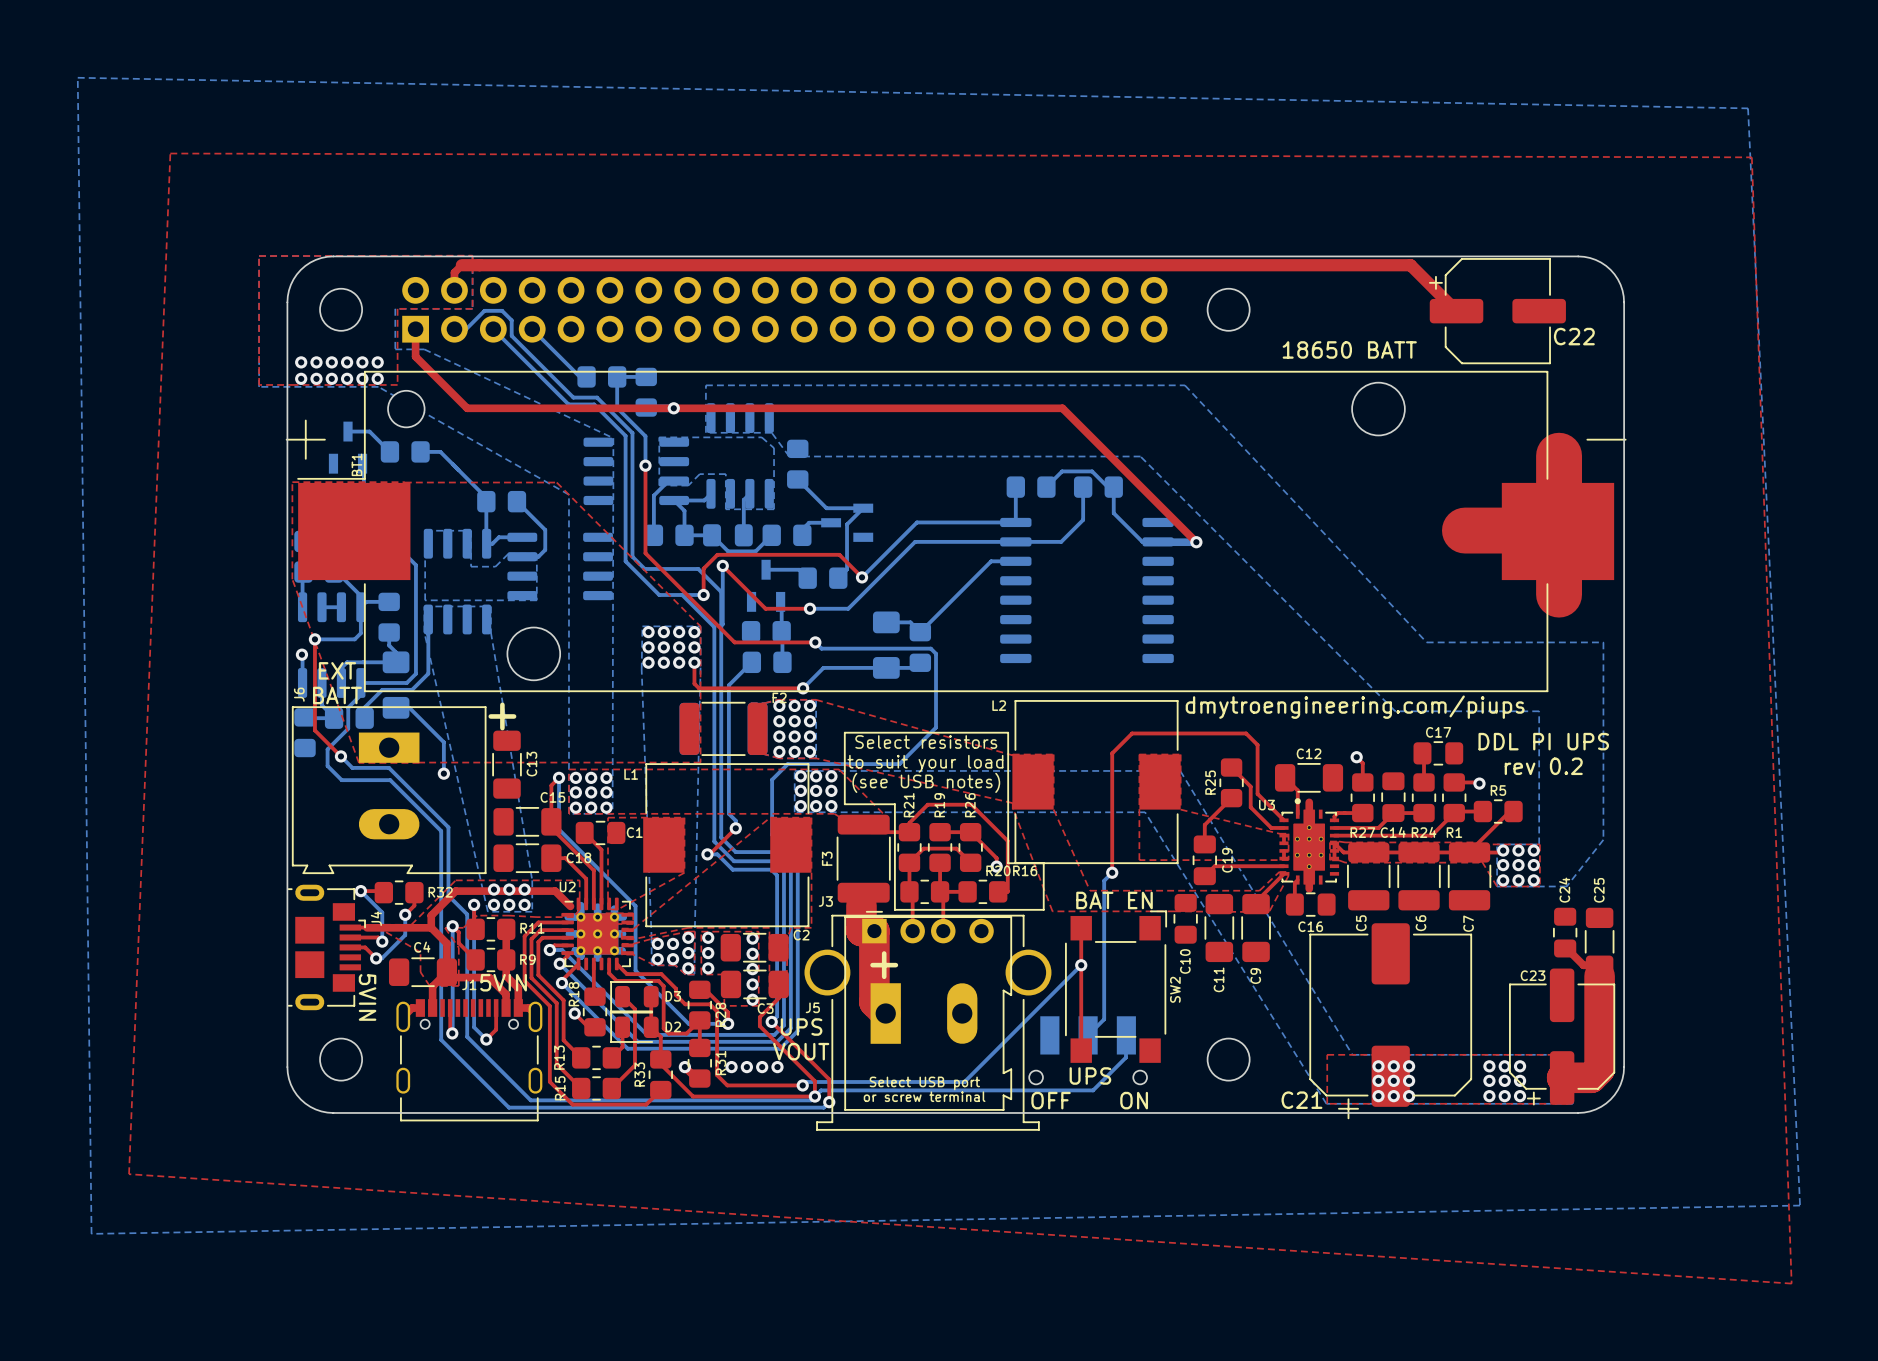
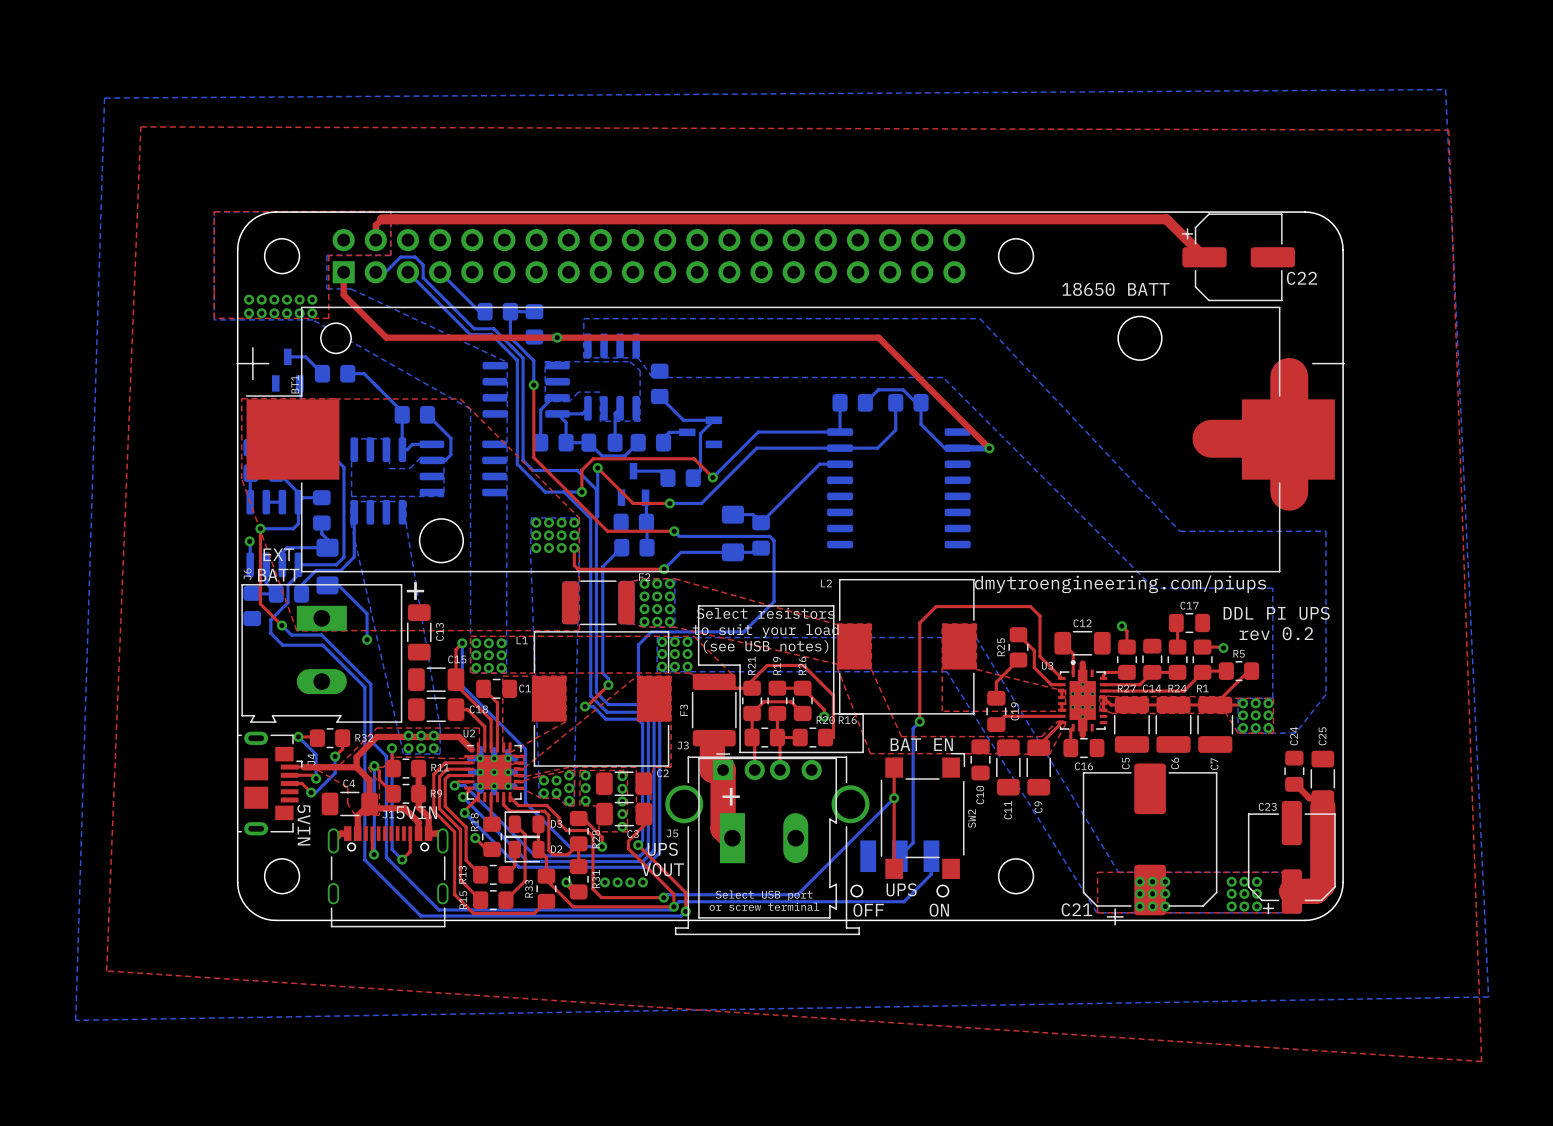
bottom zone outline: (1748, 108) (77, 77) (91, 1233) -> (1445, 89) (104, 98) (75, 1020)

